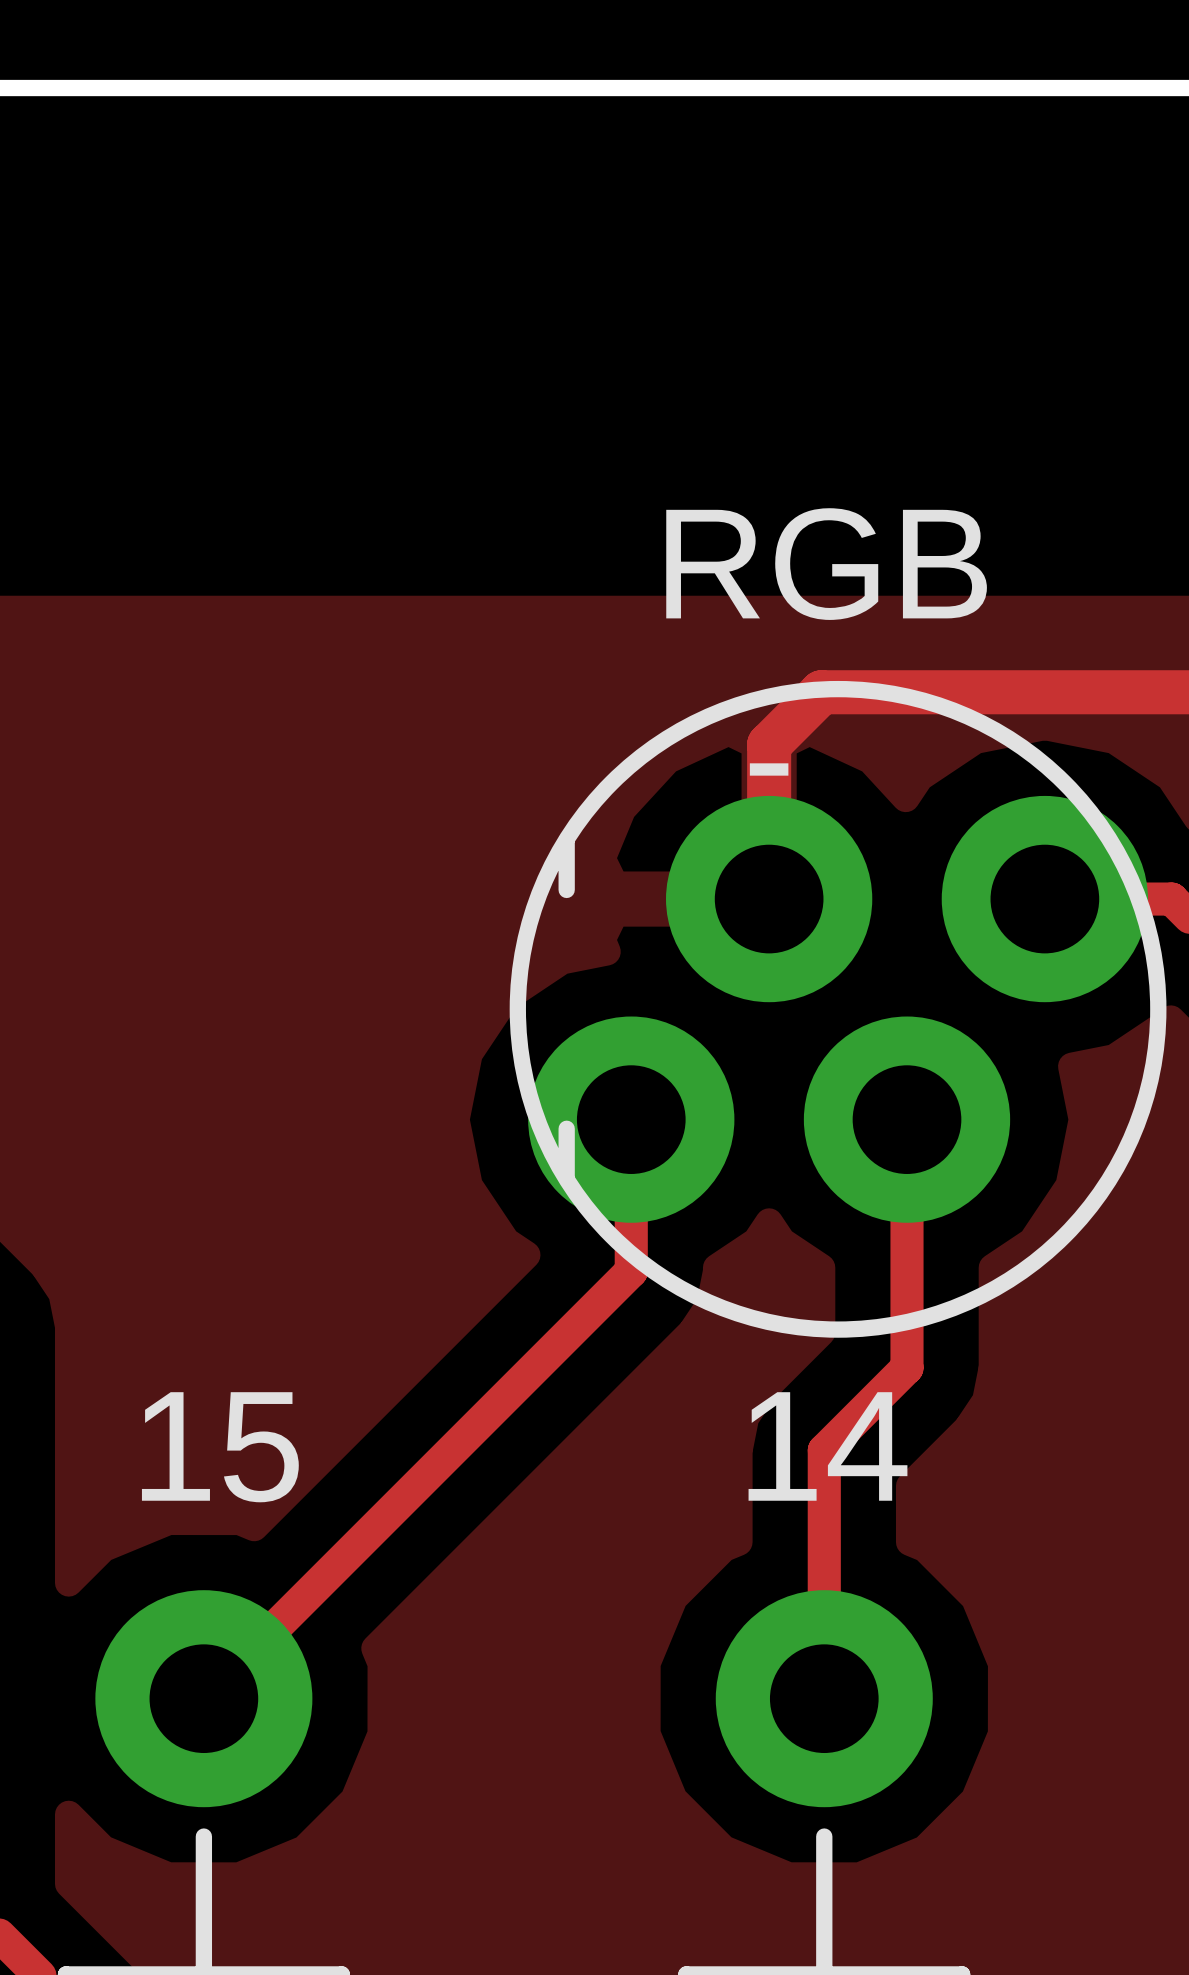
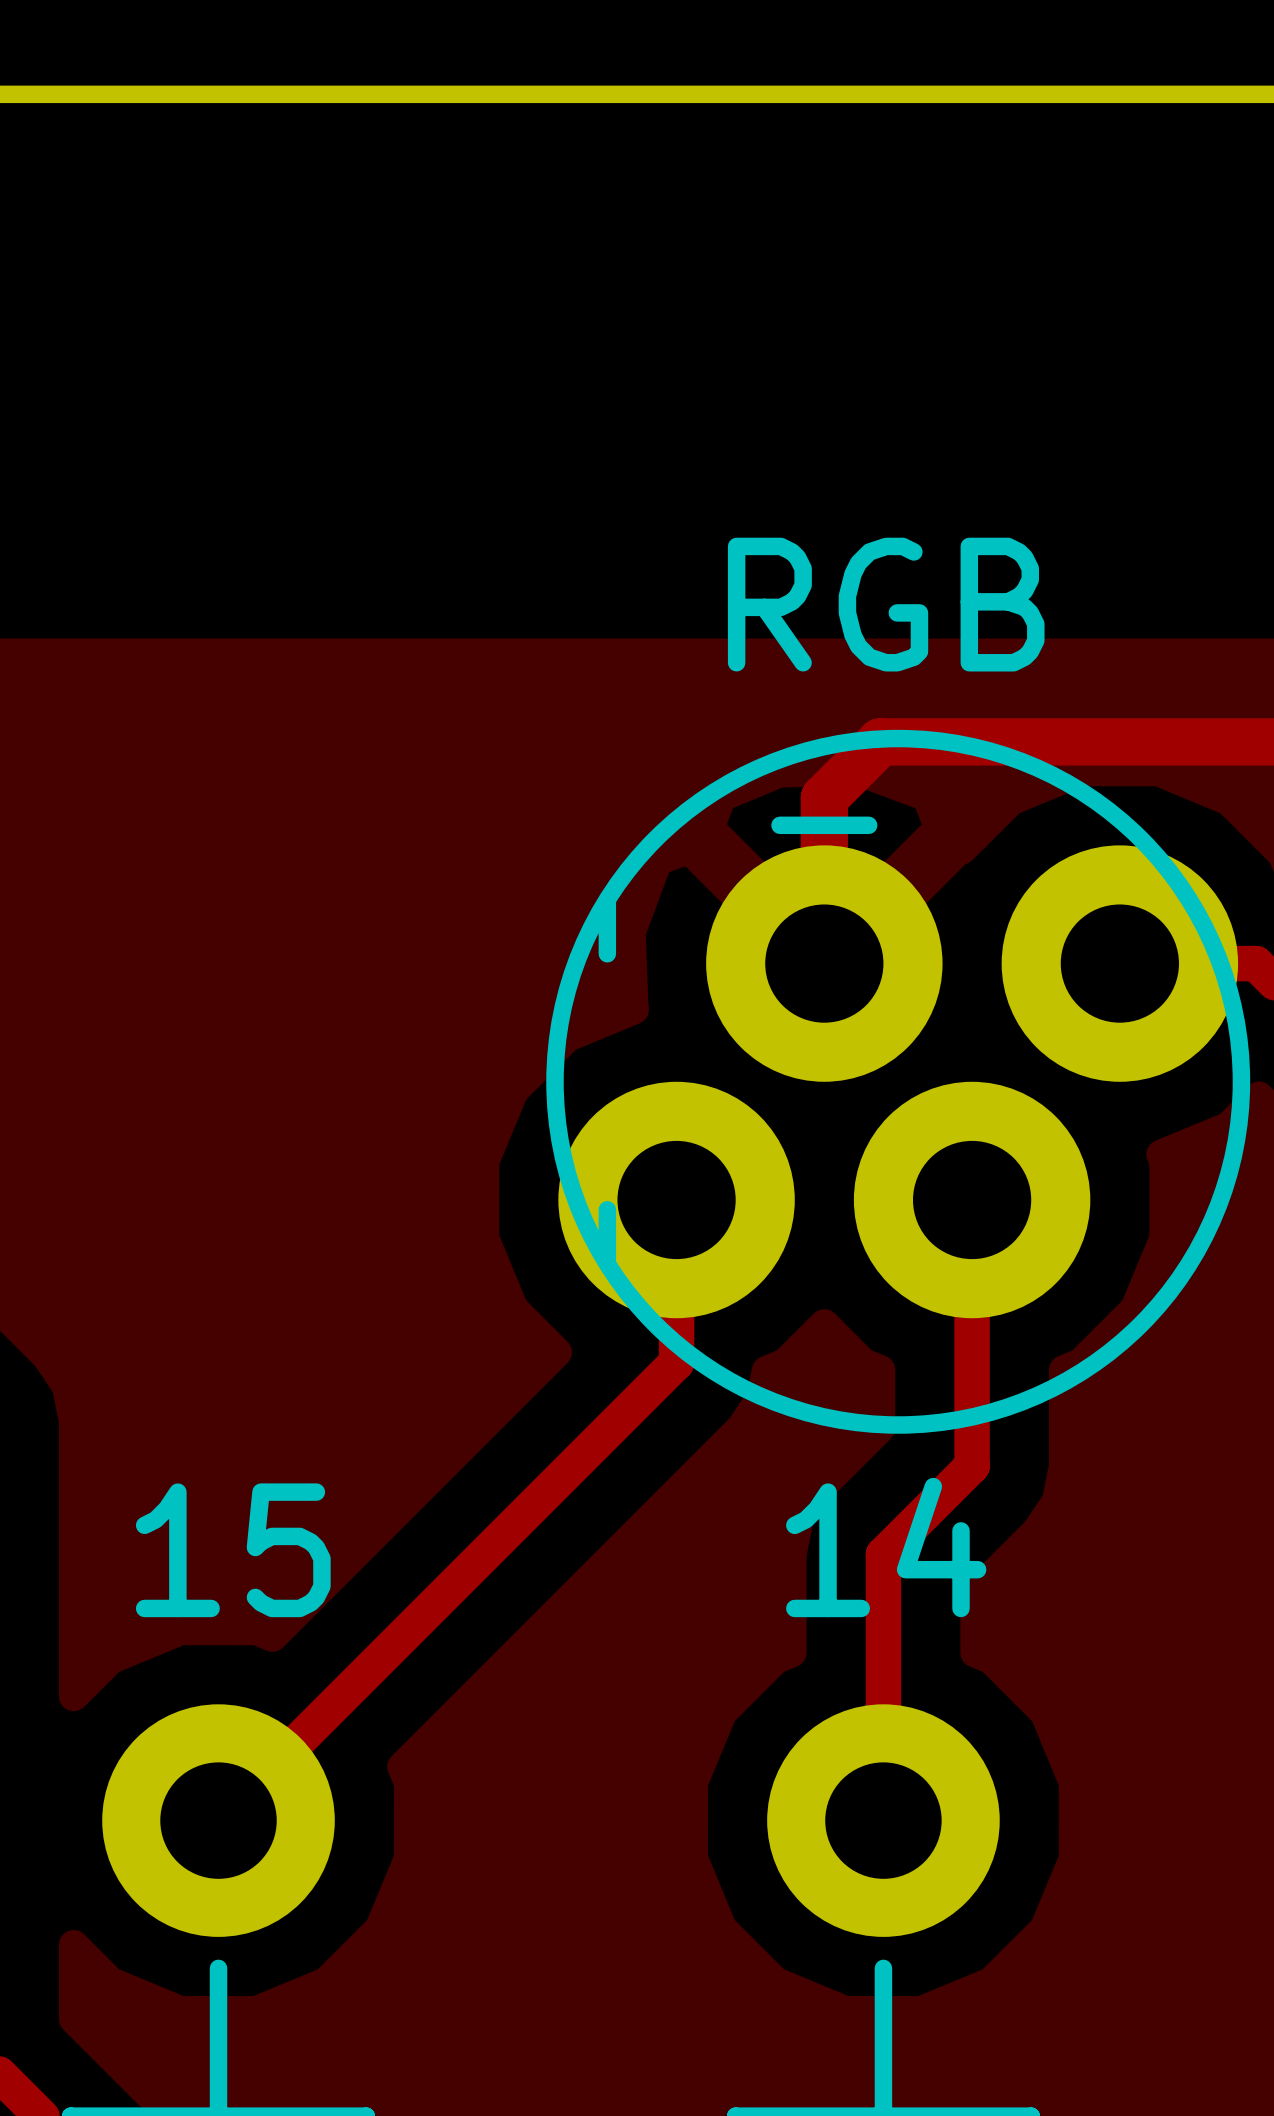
part footprint: [509, 680, 1167, 1338] -> [546, 729, 1251, 1434]

